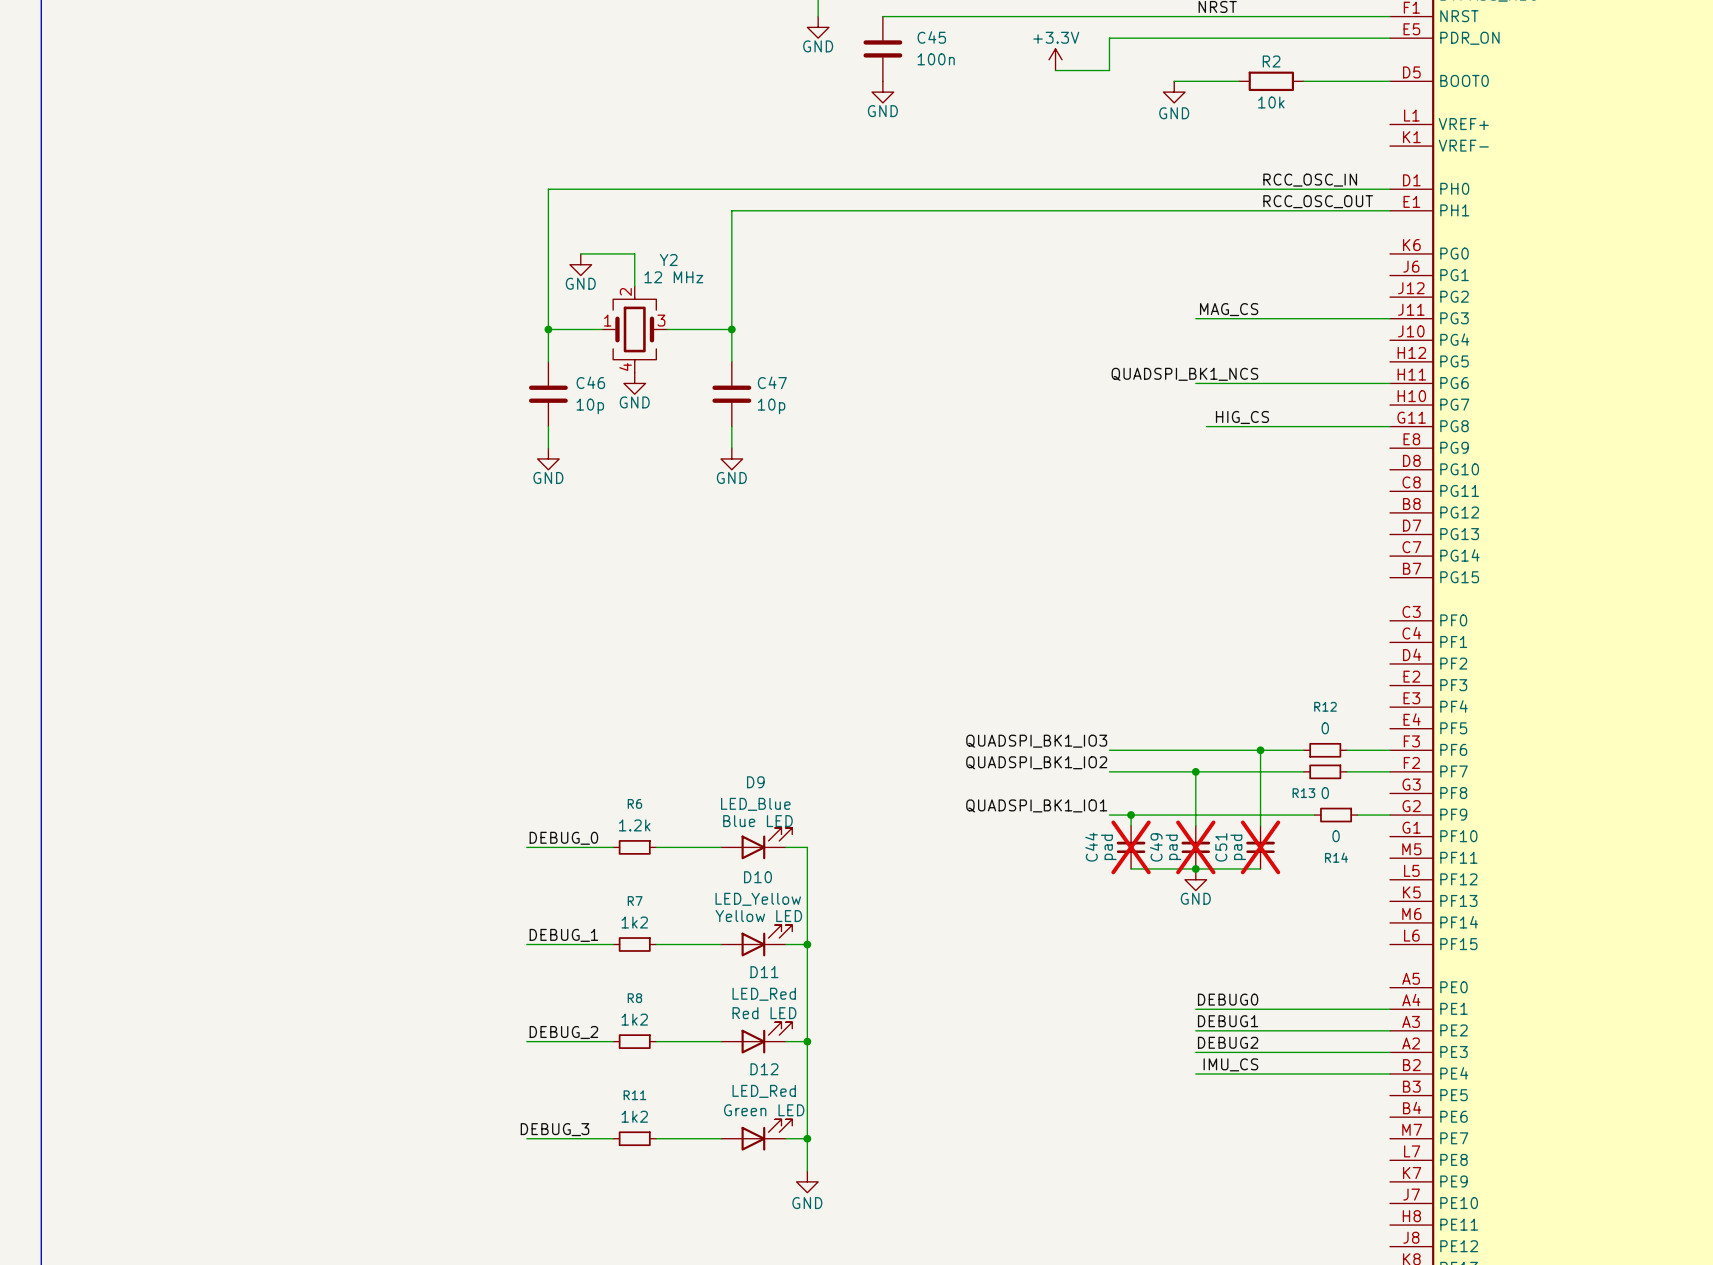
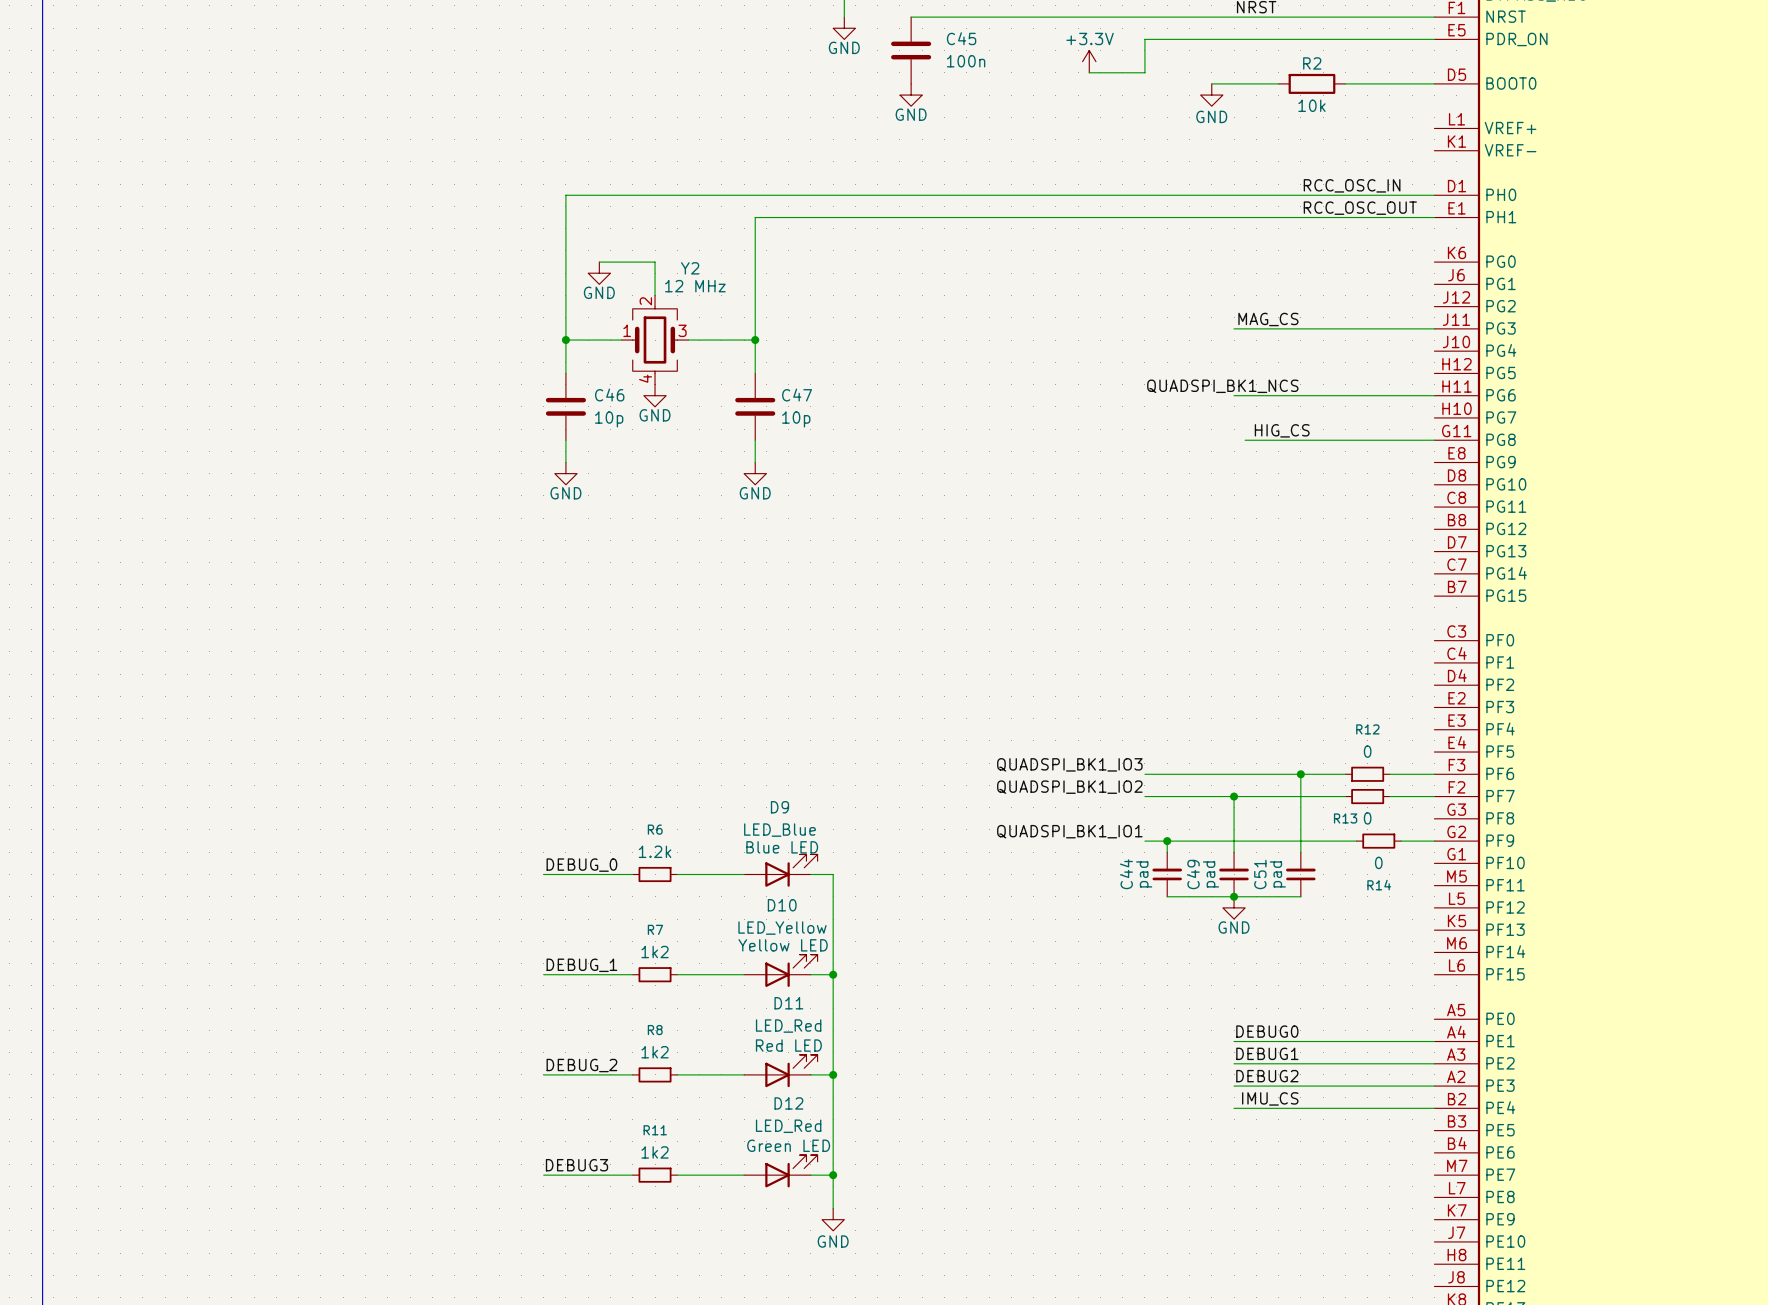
C44 do-not-place cross: (1131, 847) -> none
C49 do-not-place cross: (1195, 847) -> none
C51 do-not-place cross: (1260, 847) -> none
label: DEBUG_3 (555, 1129) -> DEBUG3 (576, 1165)

